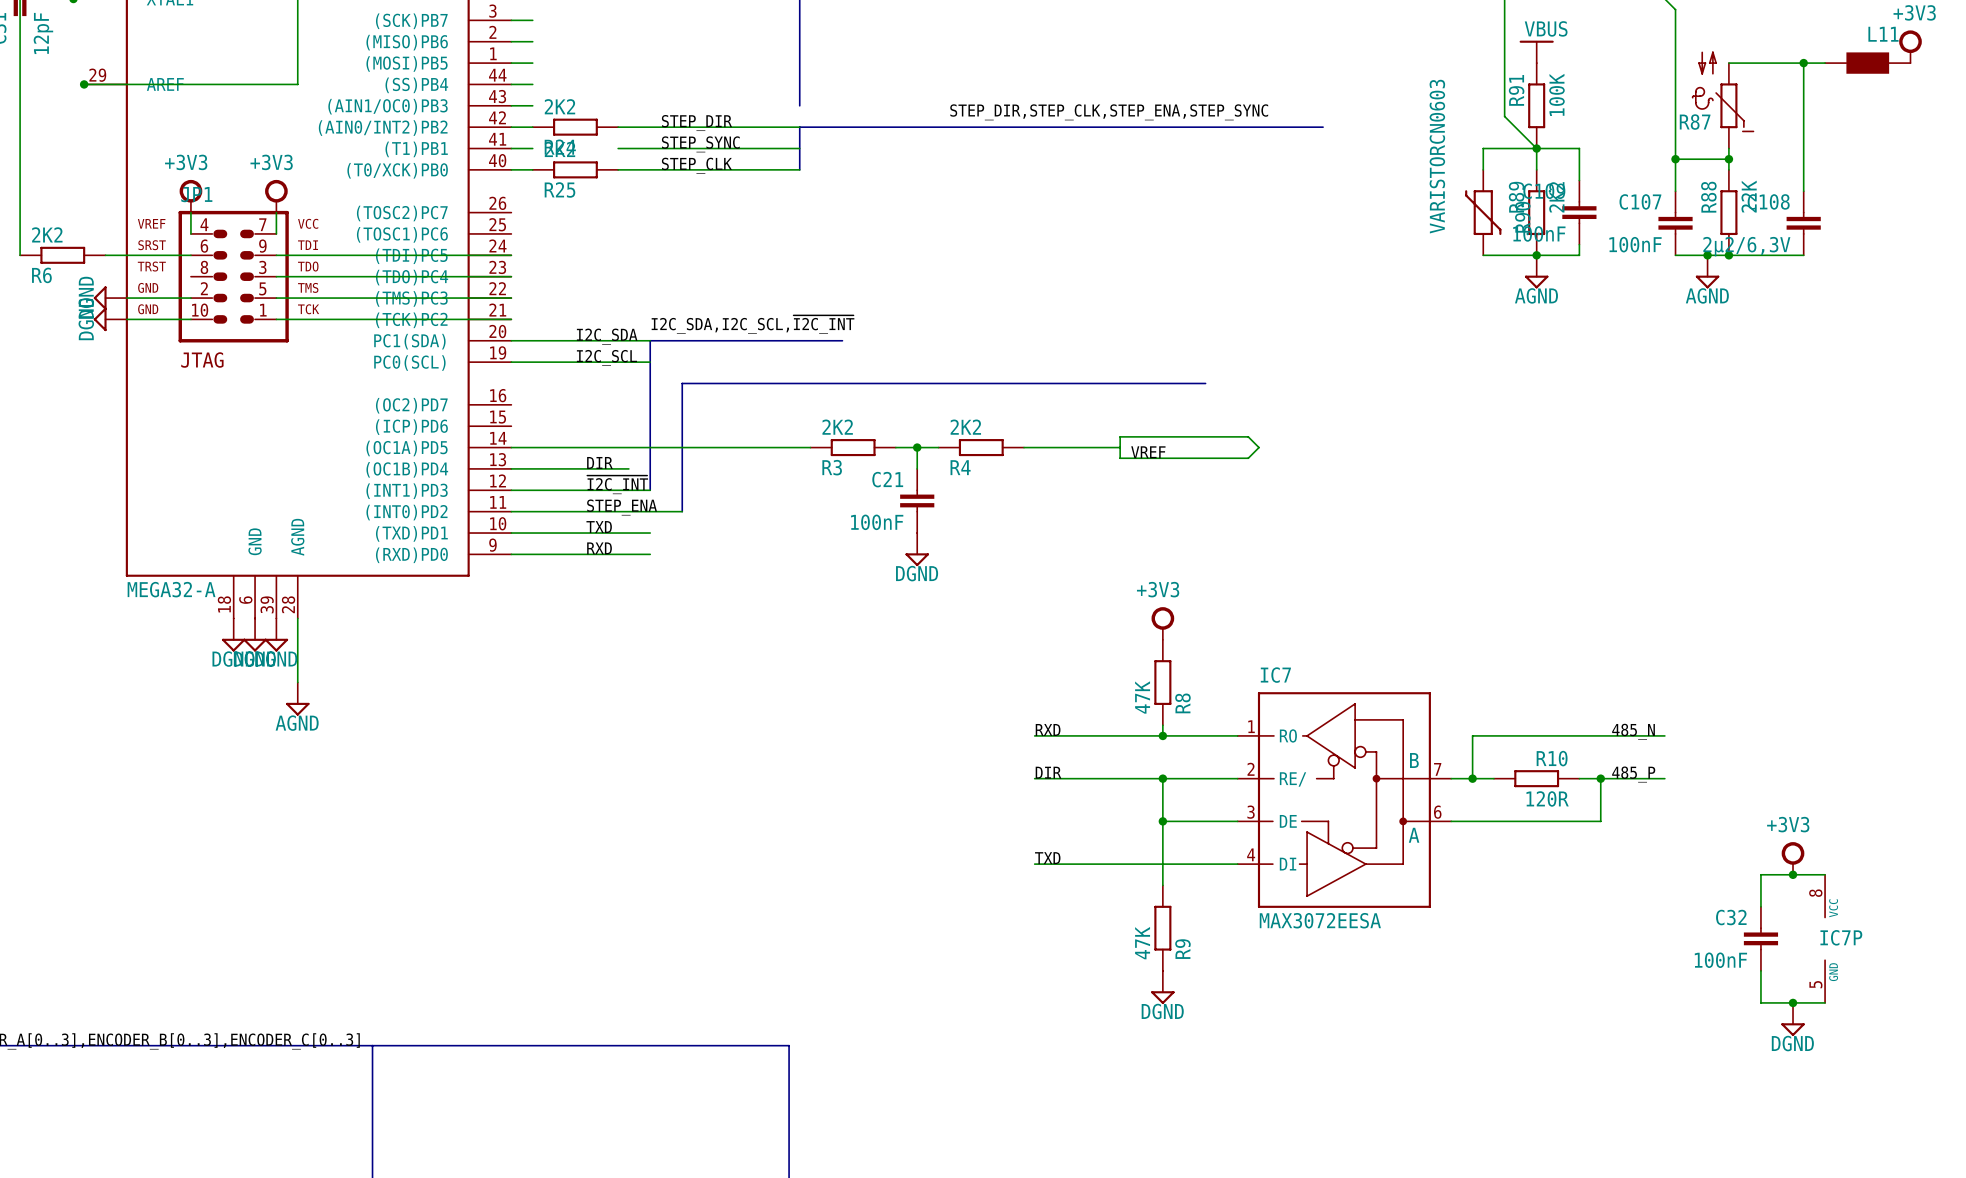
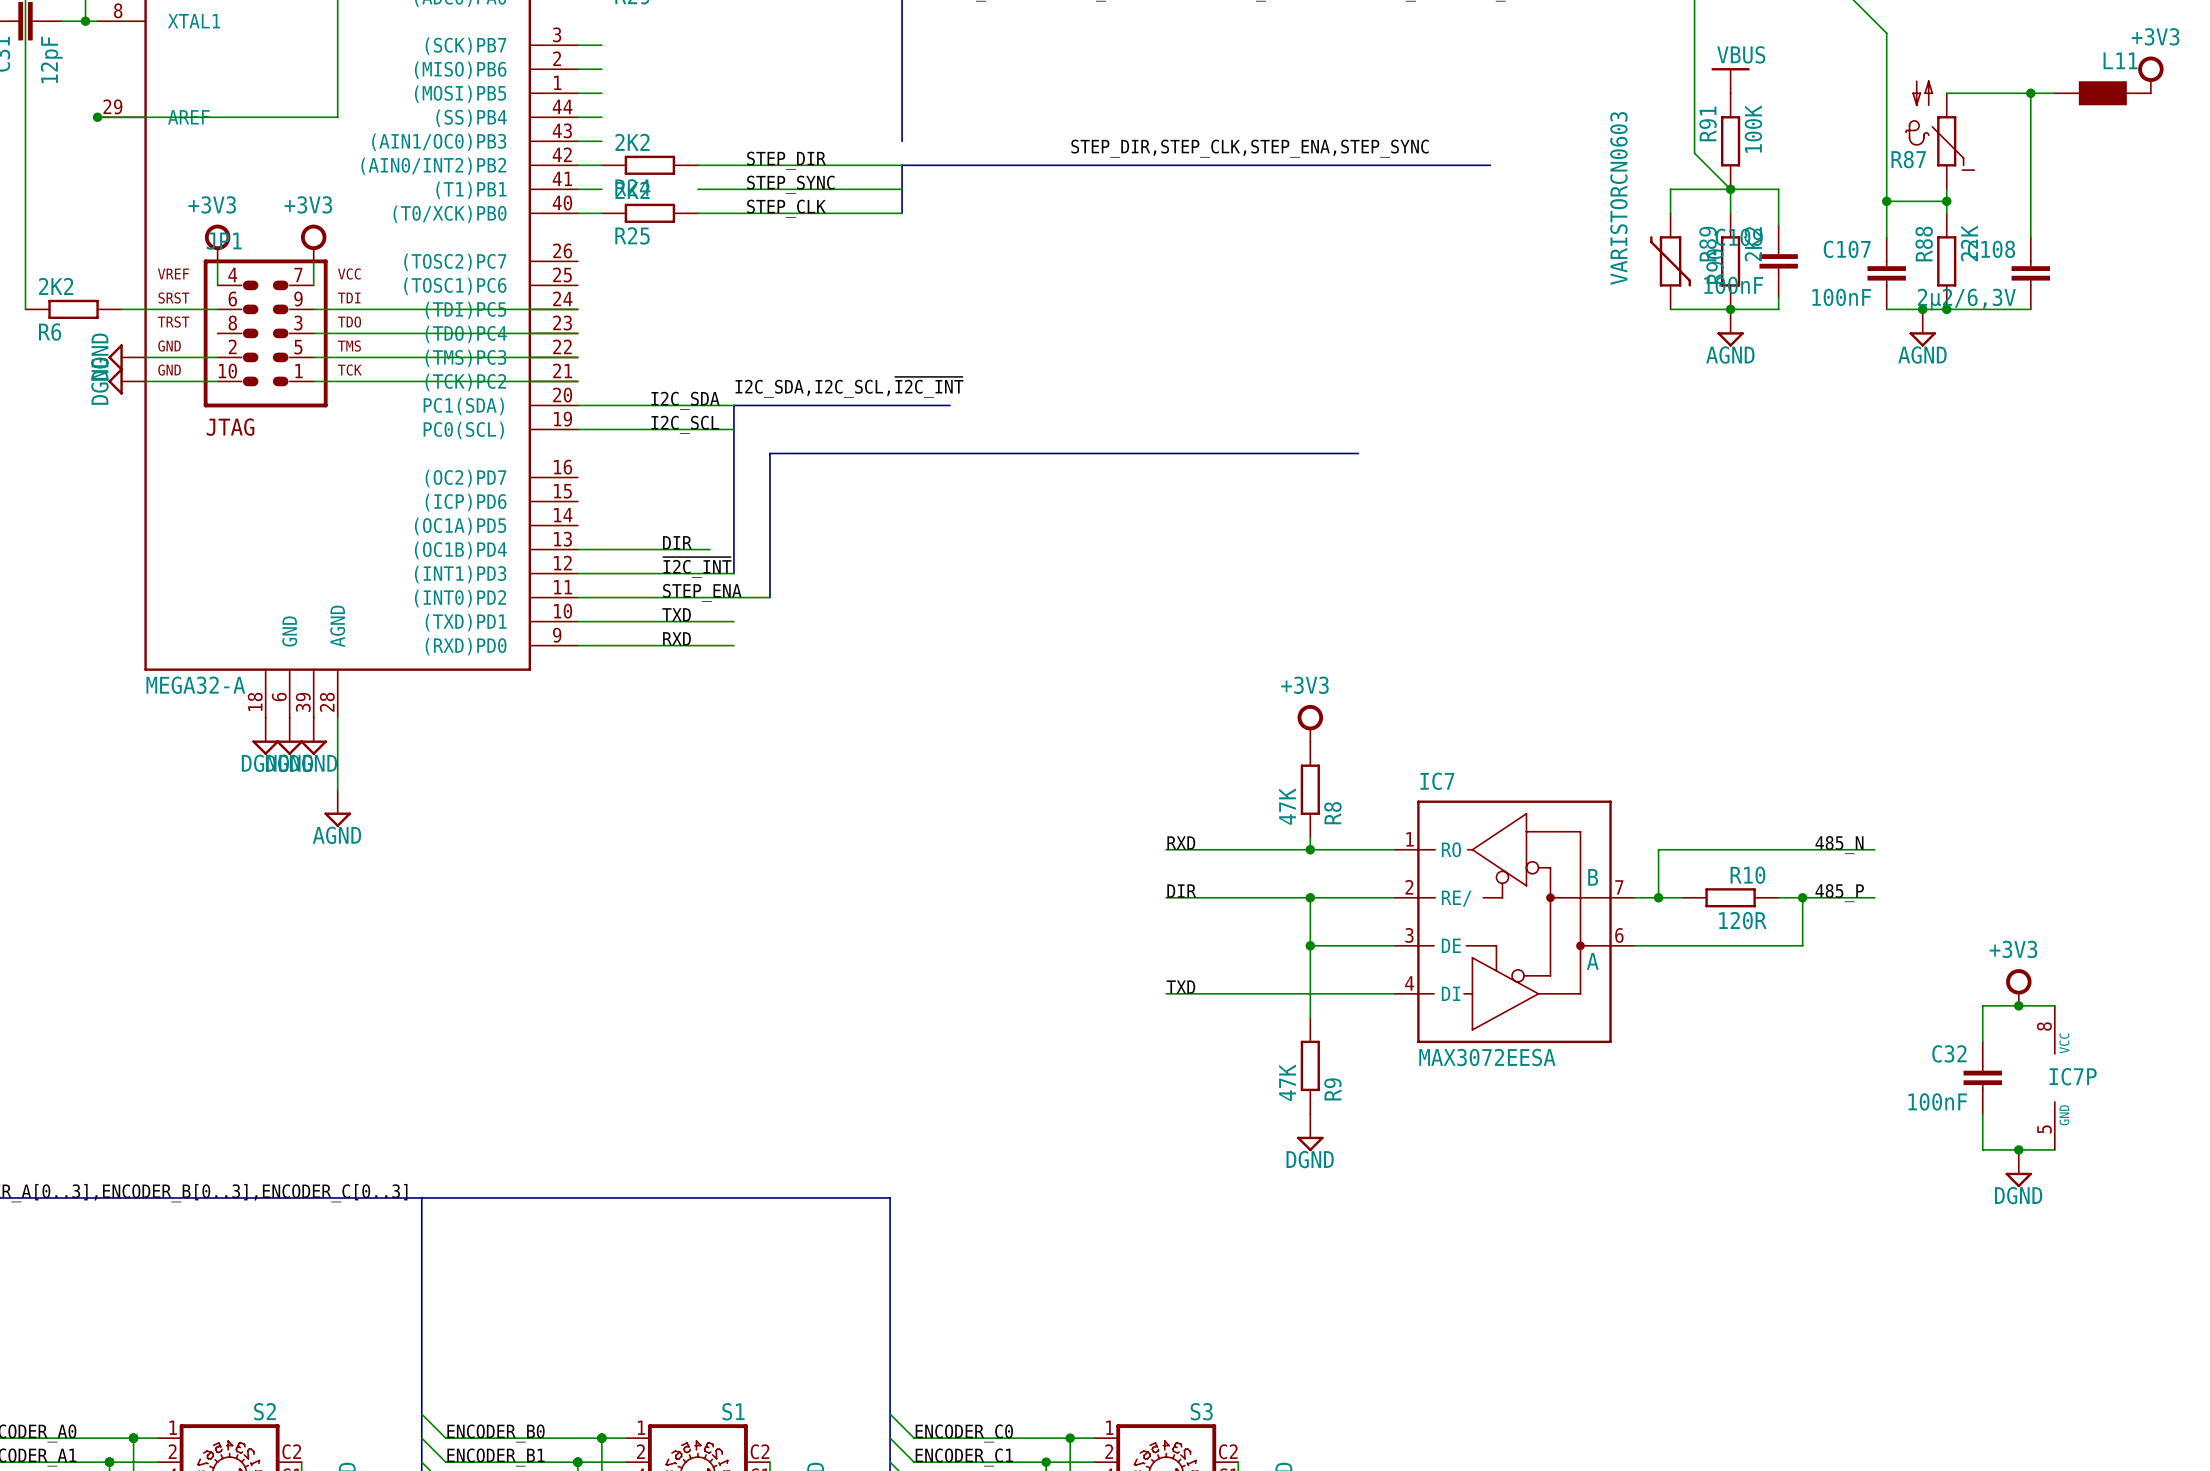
wire: (1120, 436) (1120, 458) (1248, 458) (1258, 447) (1248, 436) (1120, 436) -> none
wire: (511, 447) (810, 447) -> none
R3: 2K2 (853, 447) -> none
wire: (895, 447) (938, 447) -> none
wire: (917, 447) (917, 468) -> none
junction: (917, 447) -> none
R4: 2K2 (981, 447) -> none
wire: (1024, 447) (1120, 447) -> none
label: VREF (1148, 452) -> none
C21: 100nF (917, 500) -> none
power symbol: DGND (917, 549) -> none

